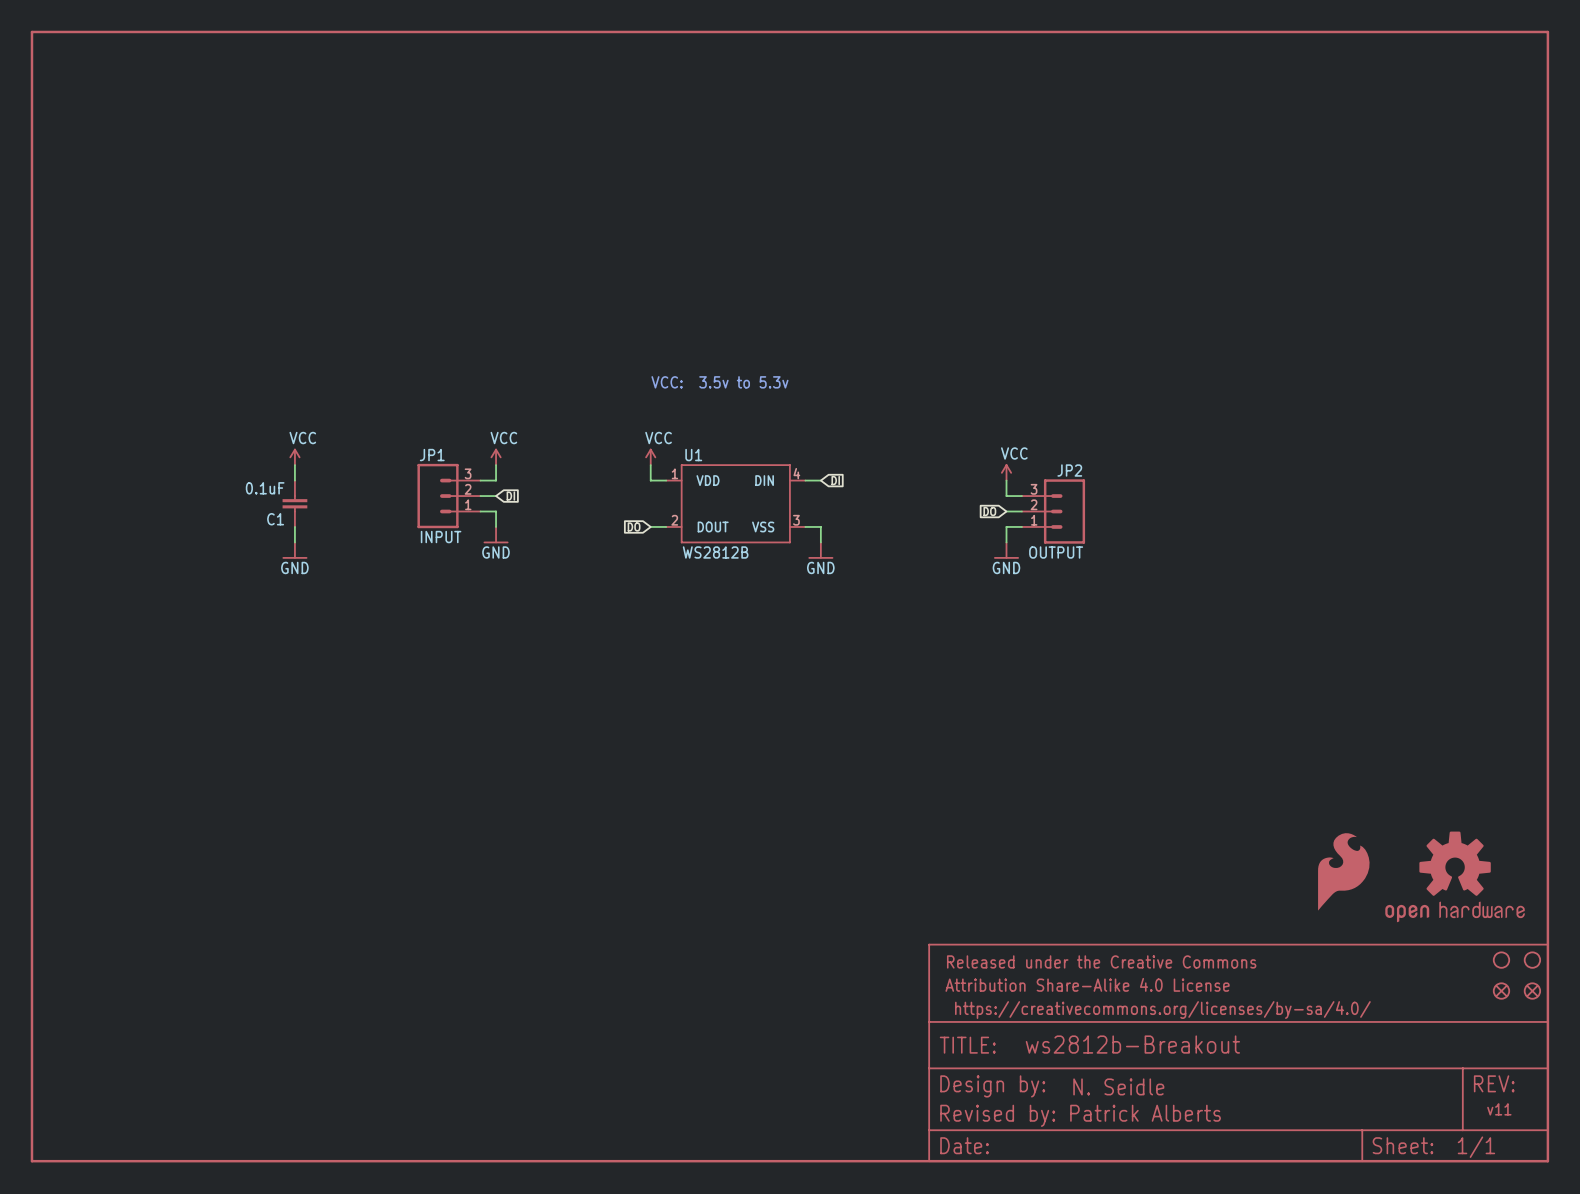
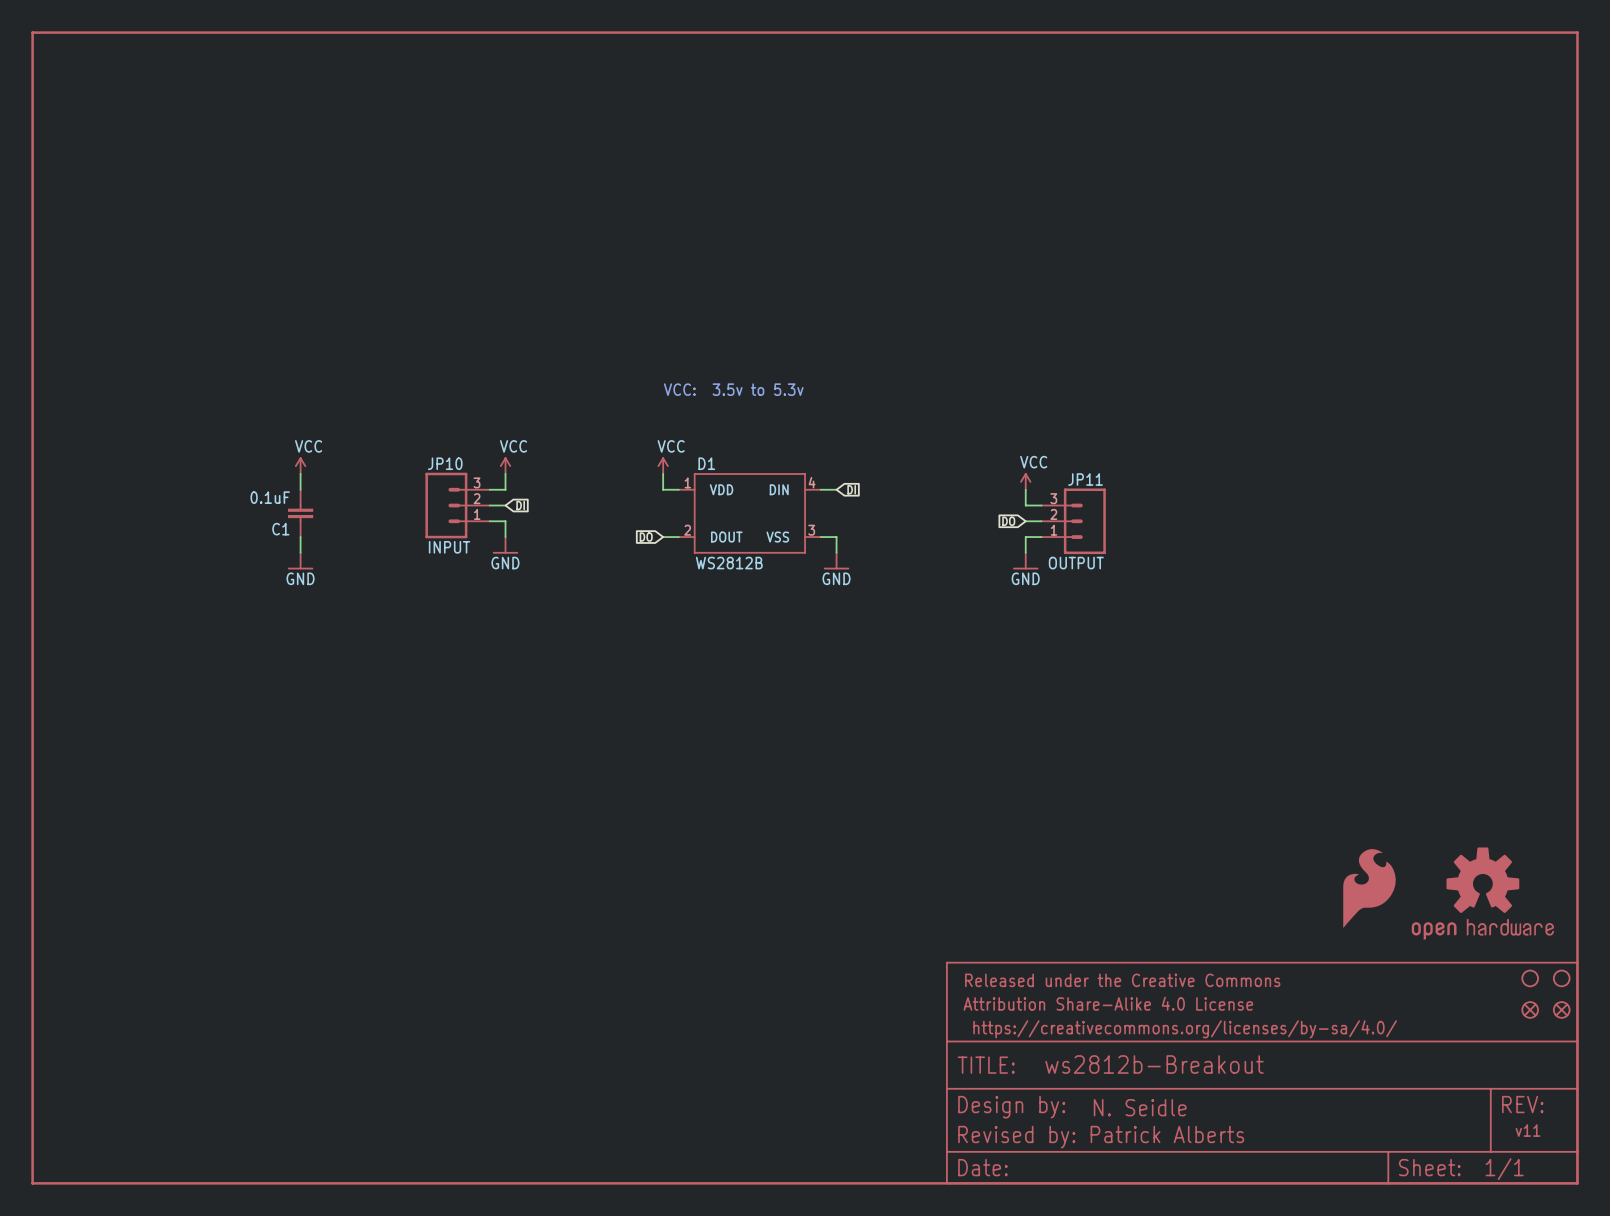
JP1 name: JP1 (432, 455) -> JP10 (445, 463)
U1 name: U1 (693, 455) -> D1 (706, 463)
JP2 name: JP2 (1069, 470) -> JP11 (1085, 479)

